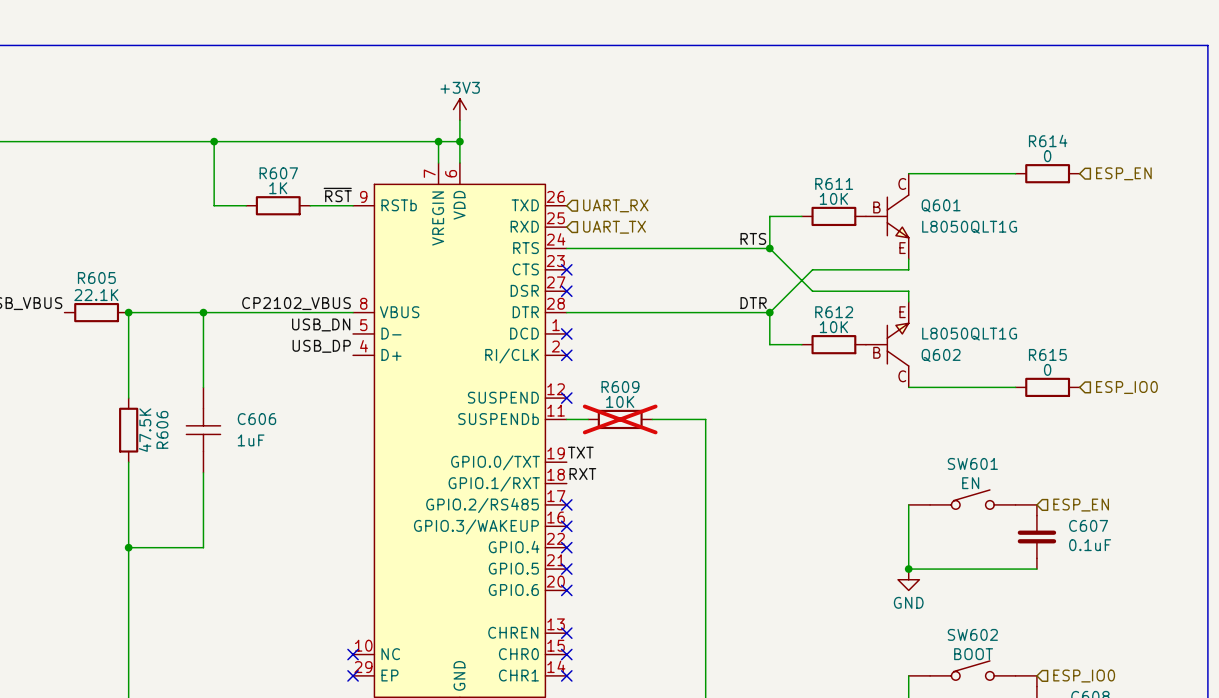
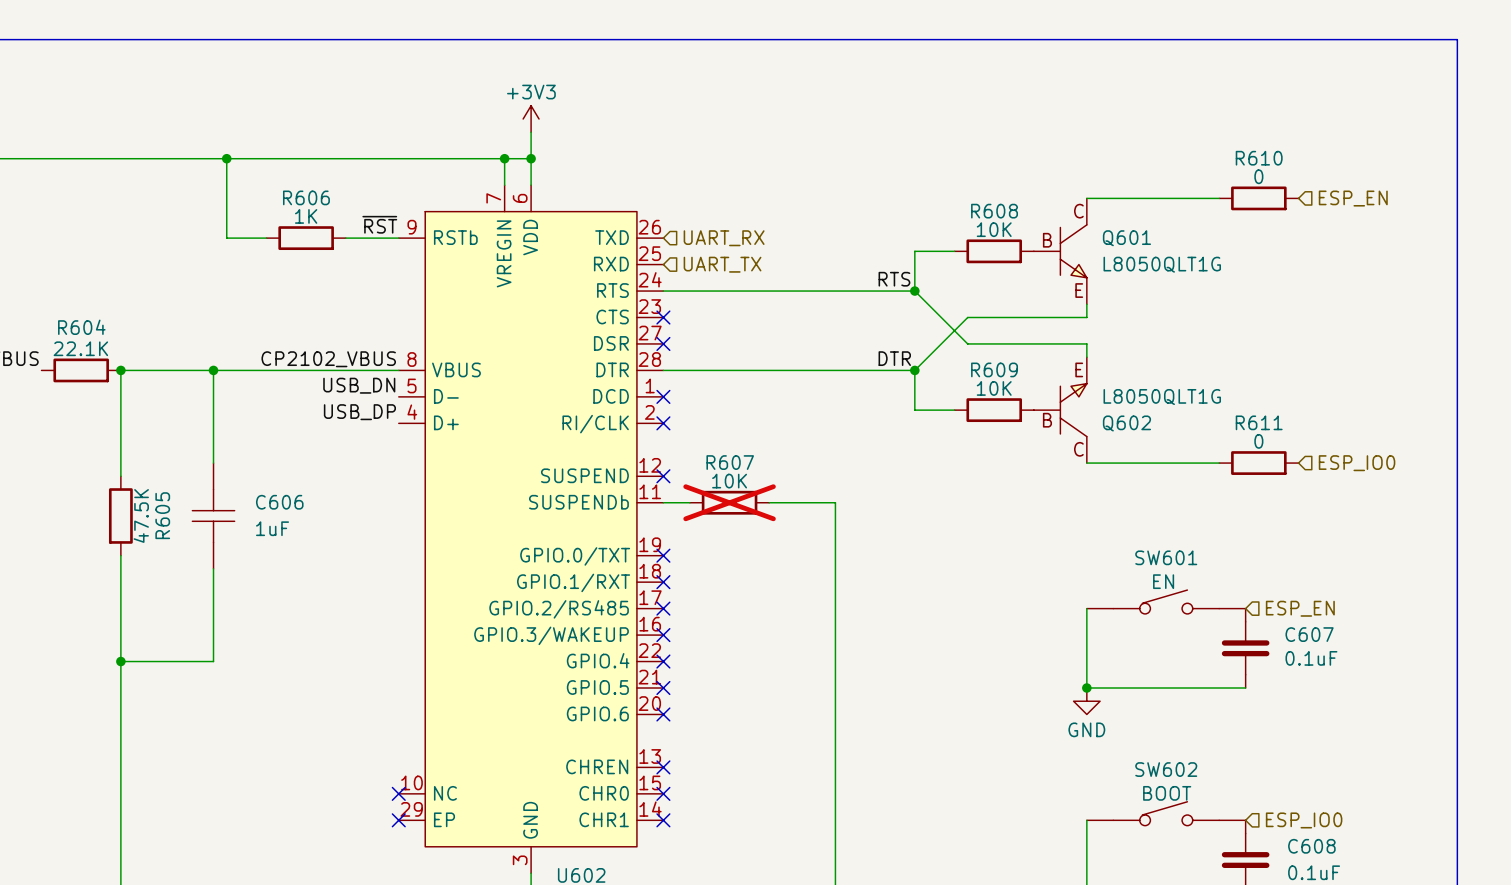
R614 name: R614 (1048, 140) -> R610 (1259, 158)
R607 name: R607 (278, 173) -> R606 (306, 197)
R611 name: R611 (834, 183) -> R608 (994, 211)
R605 name: R605 (96, 278) -> R604 (81, 327)
R612 name: R612 (834, 312) -> R609 (994, 369)
R615 name: R615 (1047, 354) -> R611 (1259, 422)
R609 name: R609 (620, 386) -> R607 (730, 462)
R606 name: R606 (162, 429) -> R605 (162, 515)
label: TXT (580, 452) -> none
no-connect mark: none -> (663, 555)
label: RXT (582, 474) -> none
no-connect mark: none -> (663, 582)

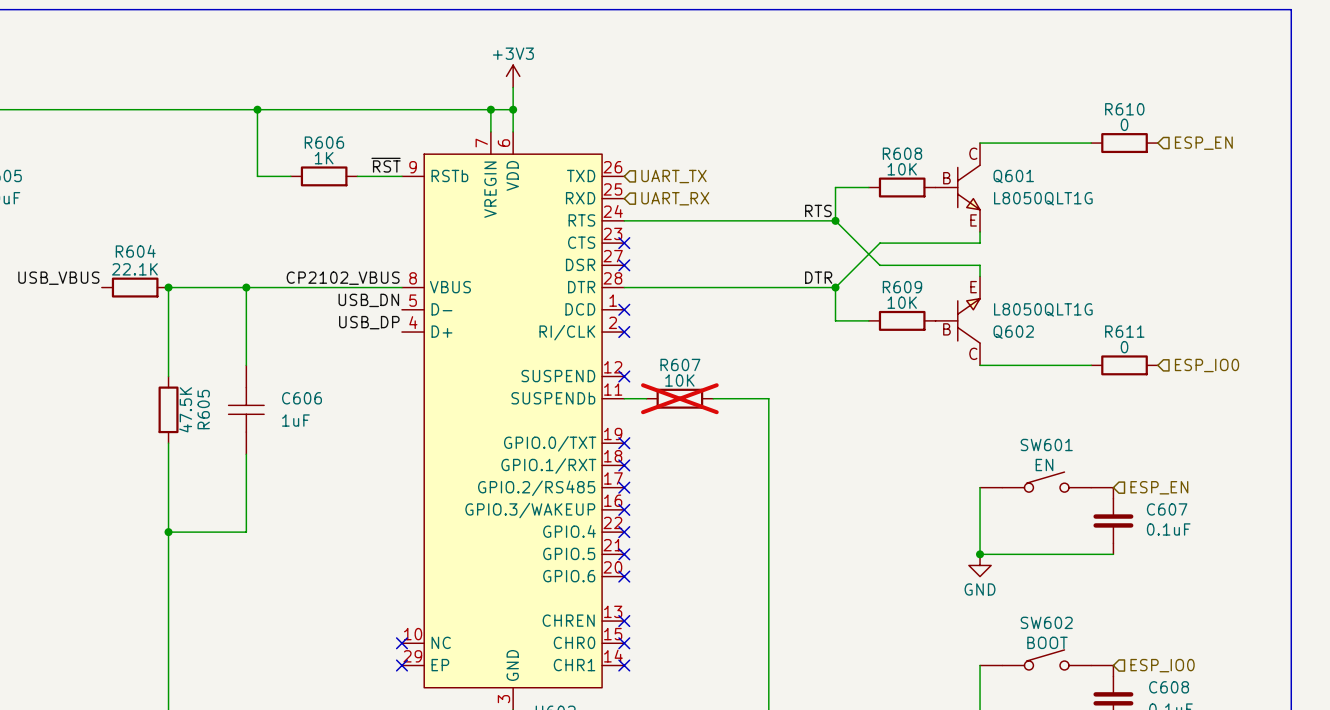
hierarchical label: UART_RX (724, 238) -> UART_TX (673, 176)
hierarchical label: UART_TX (722, 264) -> UART_RX (675, 198)

